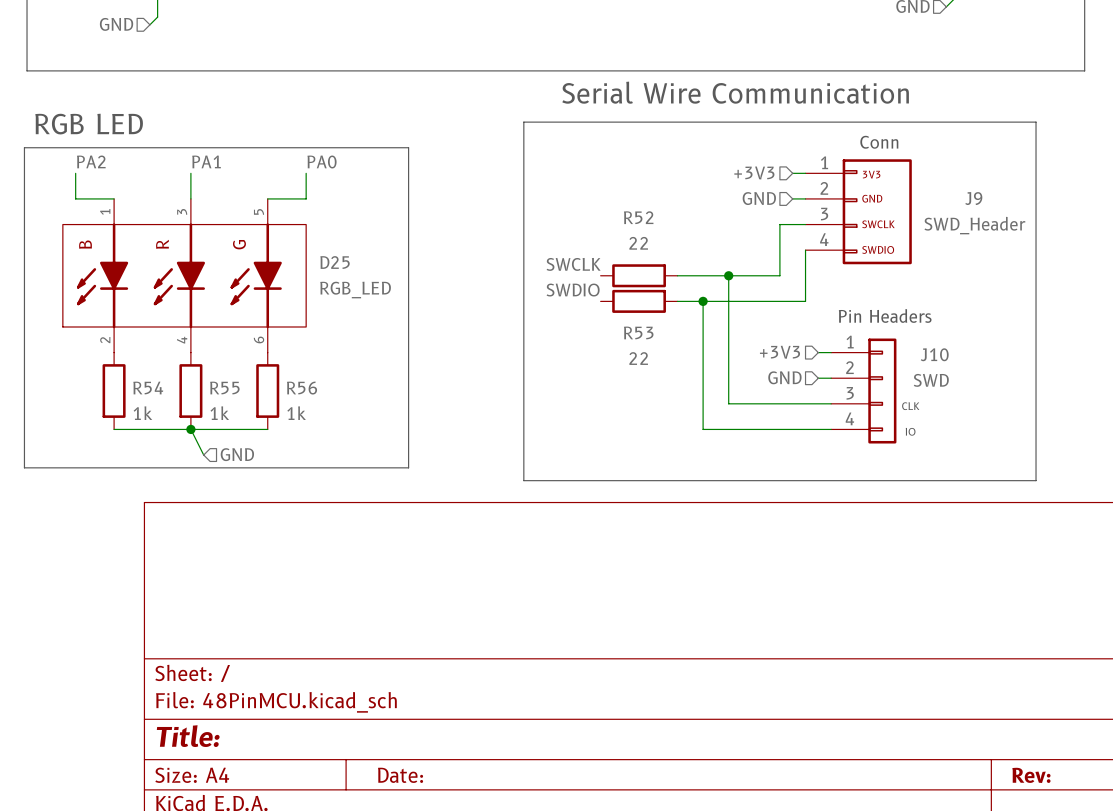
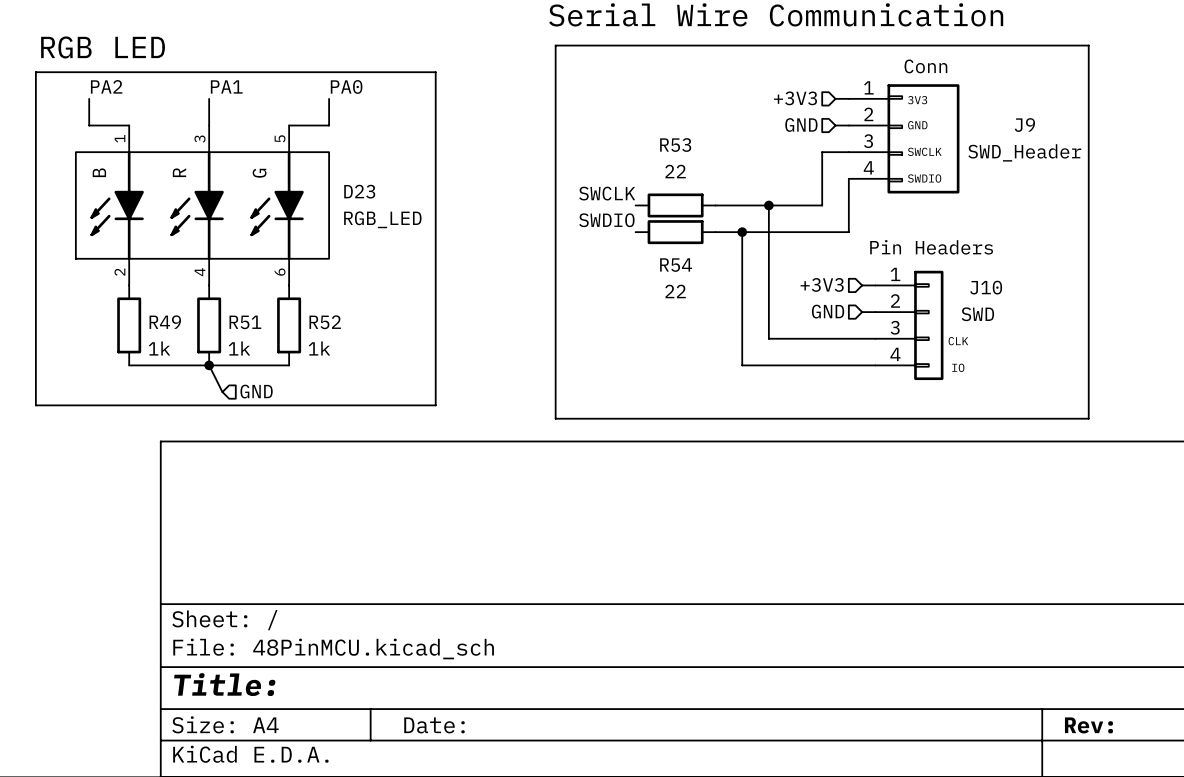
R52 name: R52 (638, 217) -> R53 (675, 145)
D25 name: D25 (335, 262) -> D23 (359, 191)
R53 name: R53 (638, 332) -> R54 (676, 265)
R54 name: R54 (148, 387) -> R49 (165, 322)
R55 name: R55 (224, 388) -> R51 (245, 322)
R56 name: R56 (302, 388) -> R52 (325, 322)

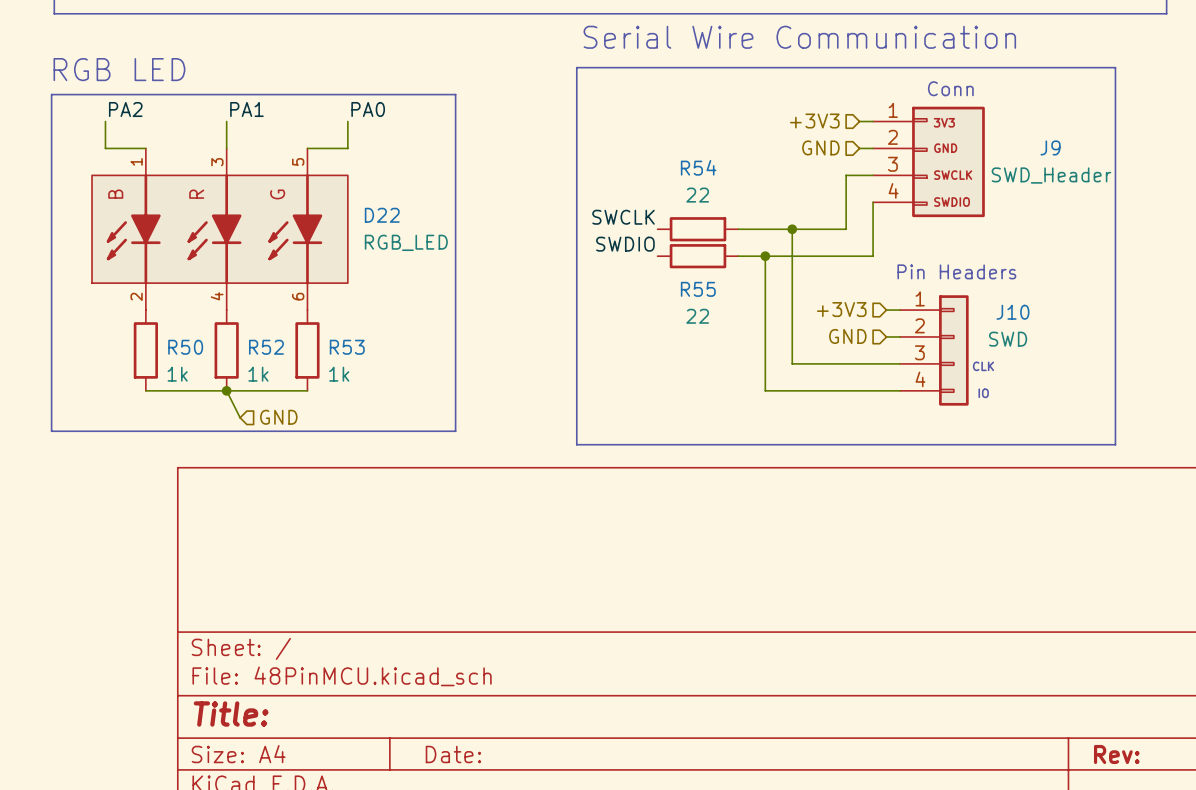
R53 name: R53 (675, 145) -> R54 (698, 167)
D23 name: D23 (359, 191) -> D22 (382, 215)
R54 name: R54 (676, 265) -> R55 (698, 289)
R49 name: R49 (165, 322) -> R50 (185, 347)
R51 name: R51 (245, 322) -> R52 (266, 347)
R52 name: R52 (325, 322) -> R53 (347, 347)

